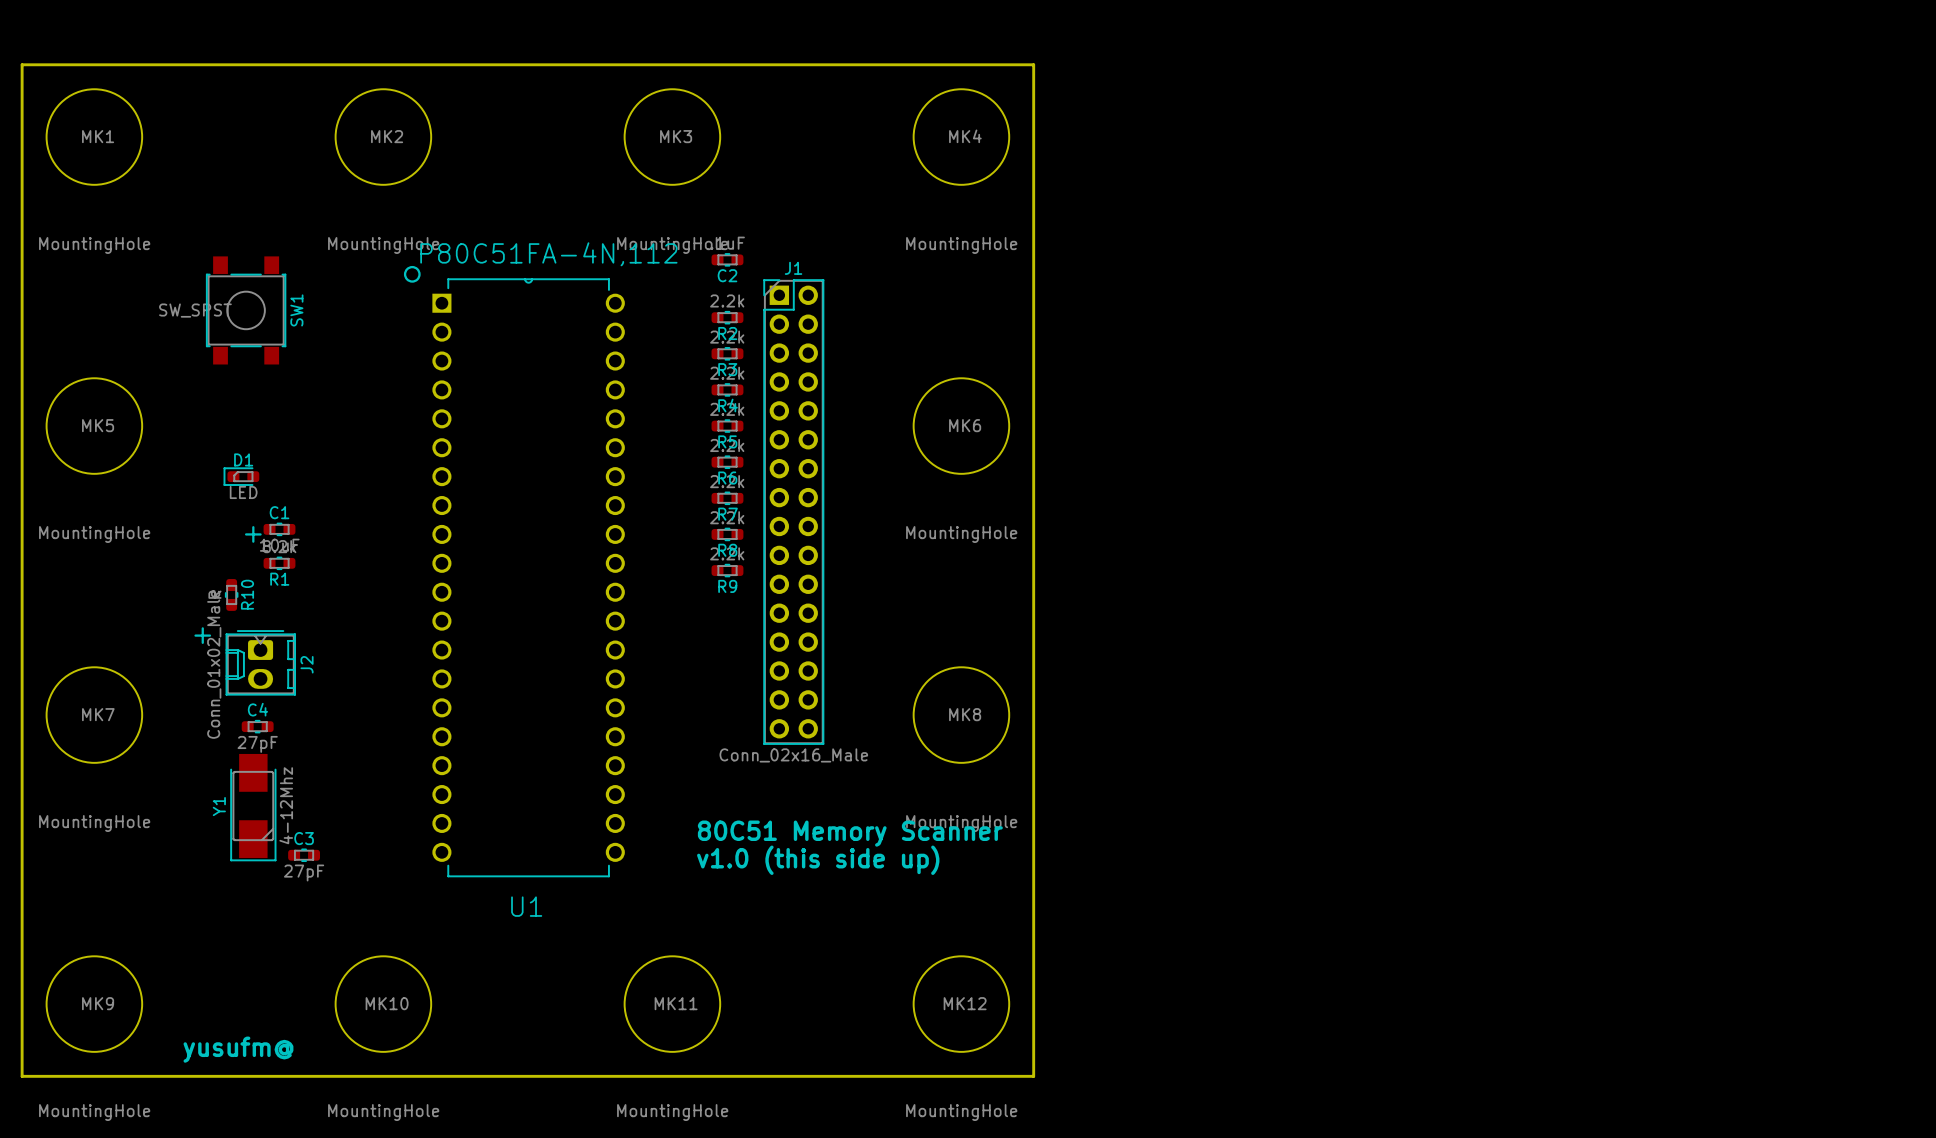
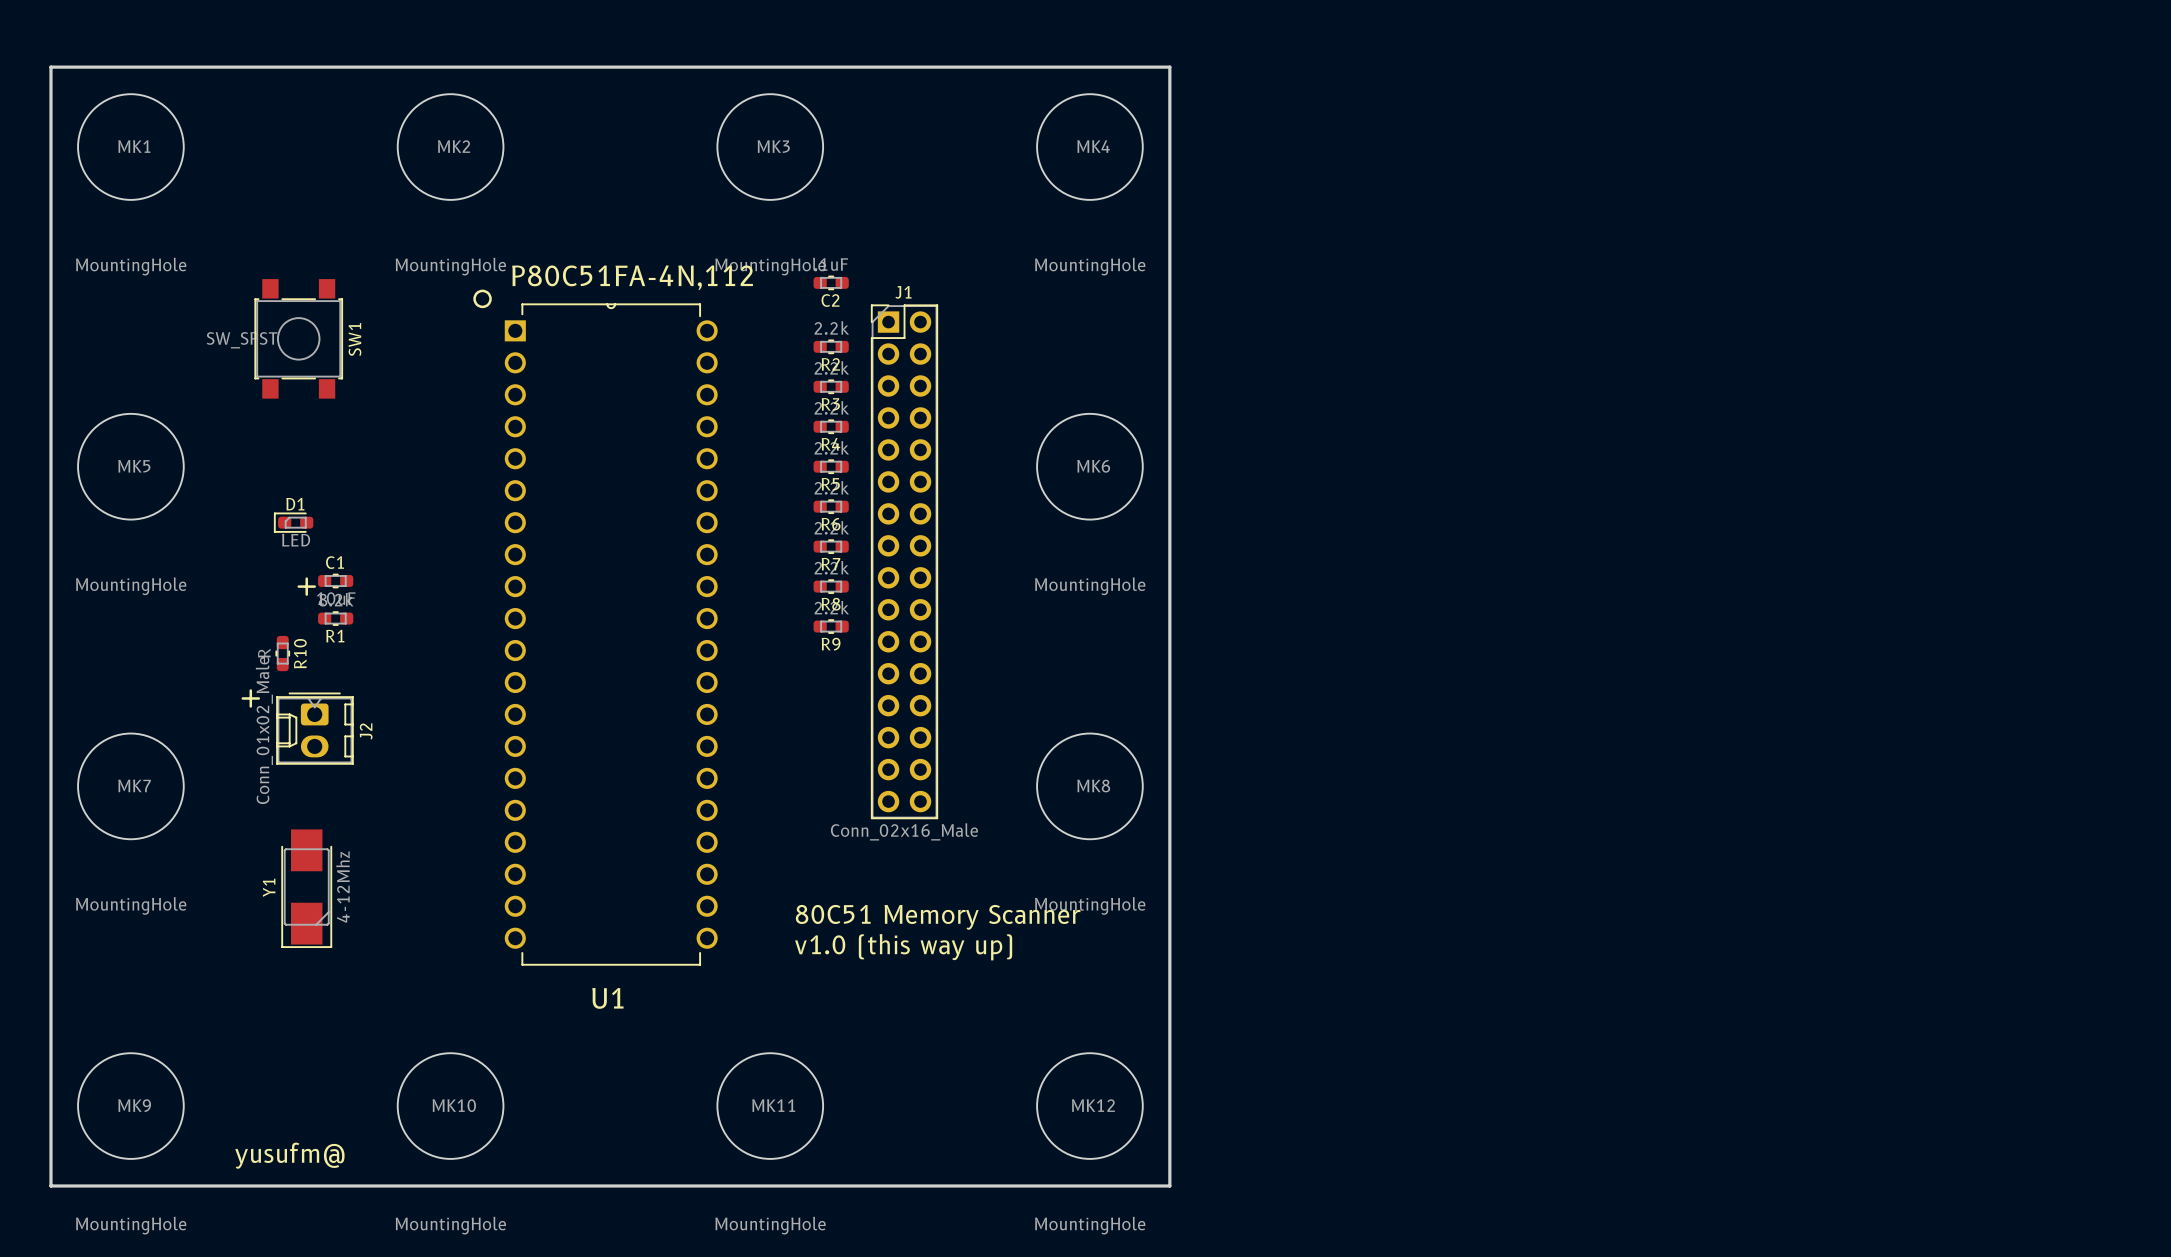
C4: 27pF (257, 726) -> none
C3: 27pF (304, 855) -> none
text: v1.0 (this side up) (818, 860) -> v1.0 (this way up) (903, 947)

